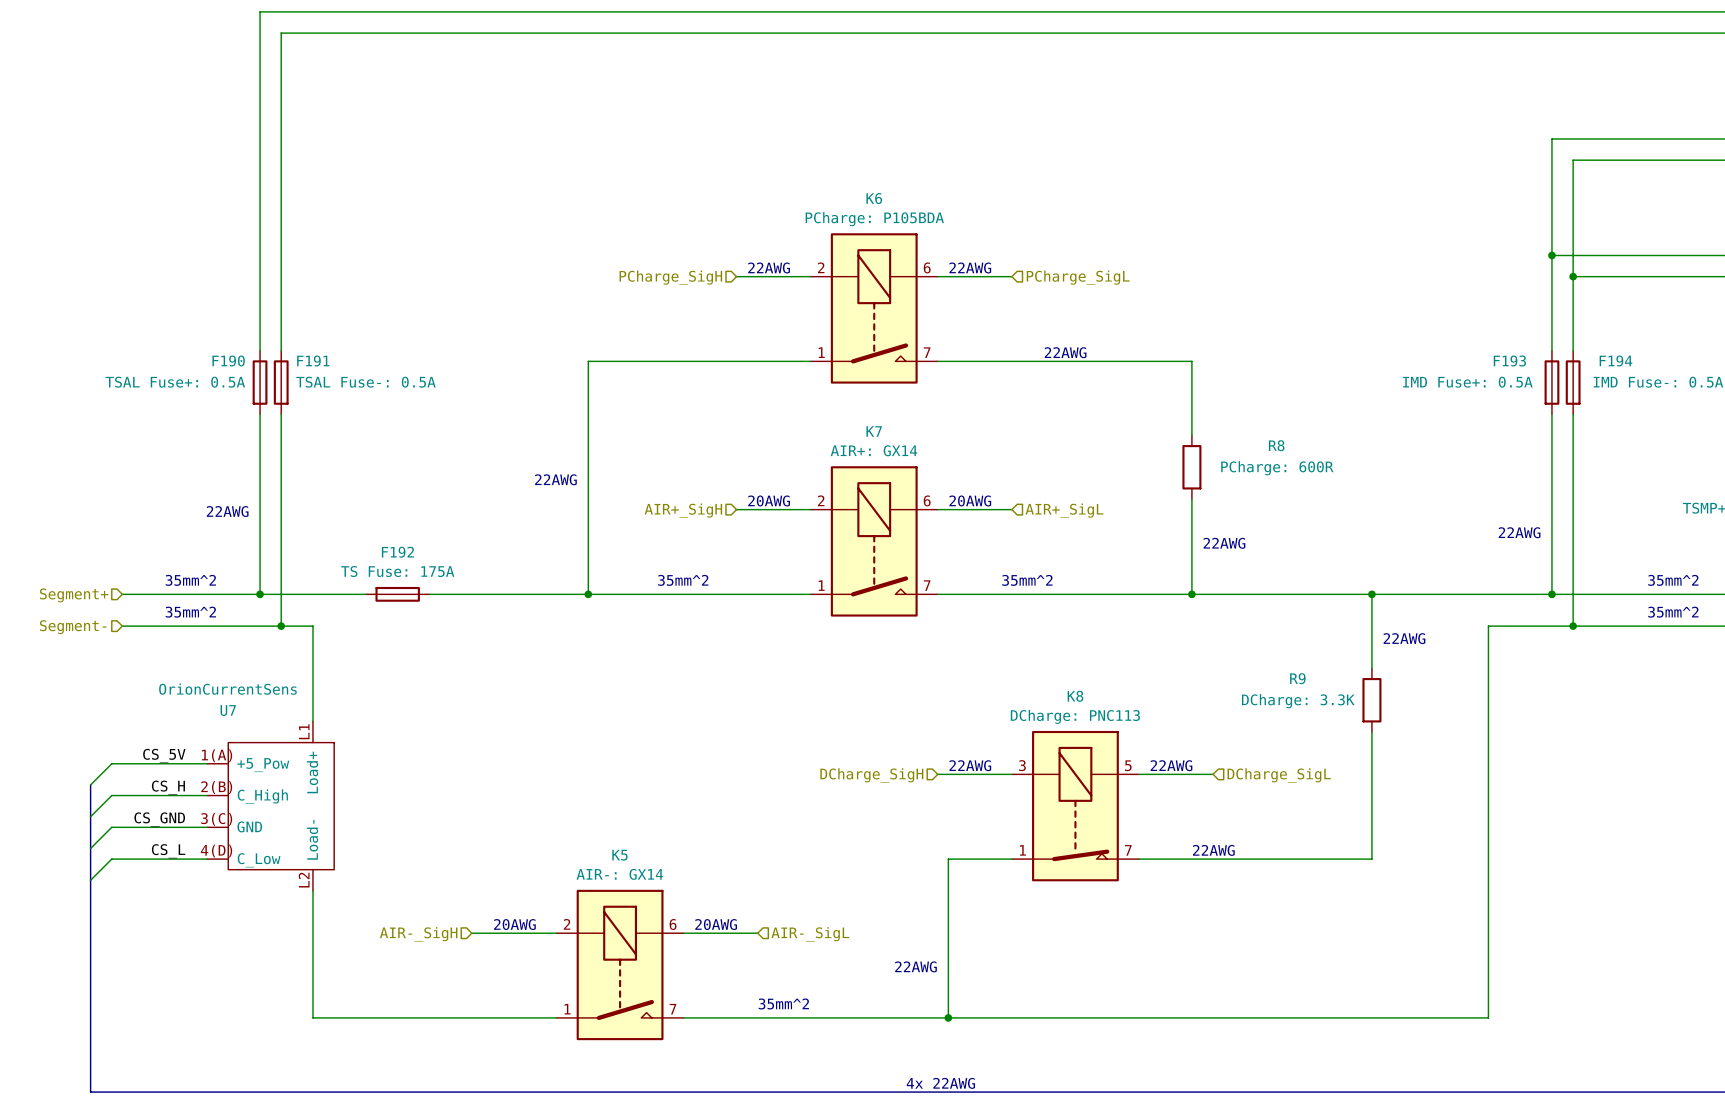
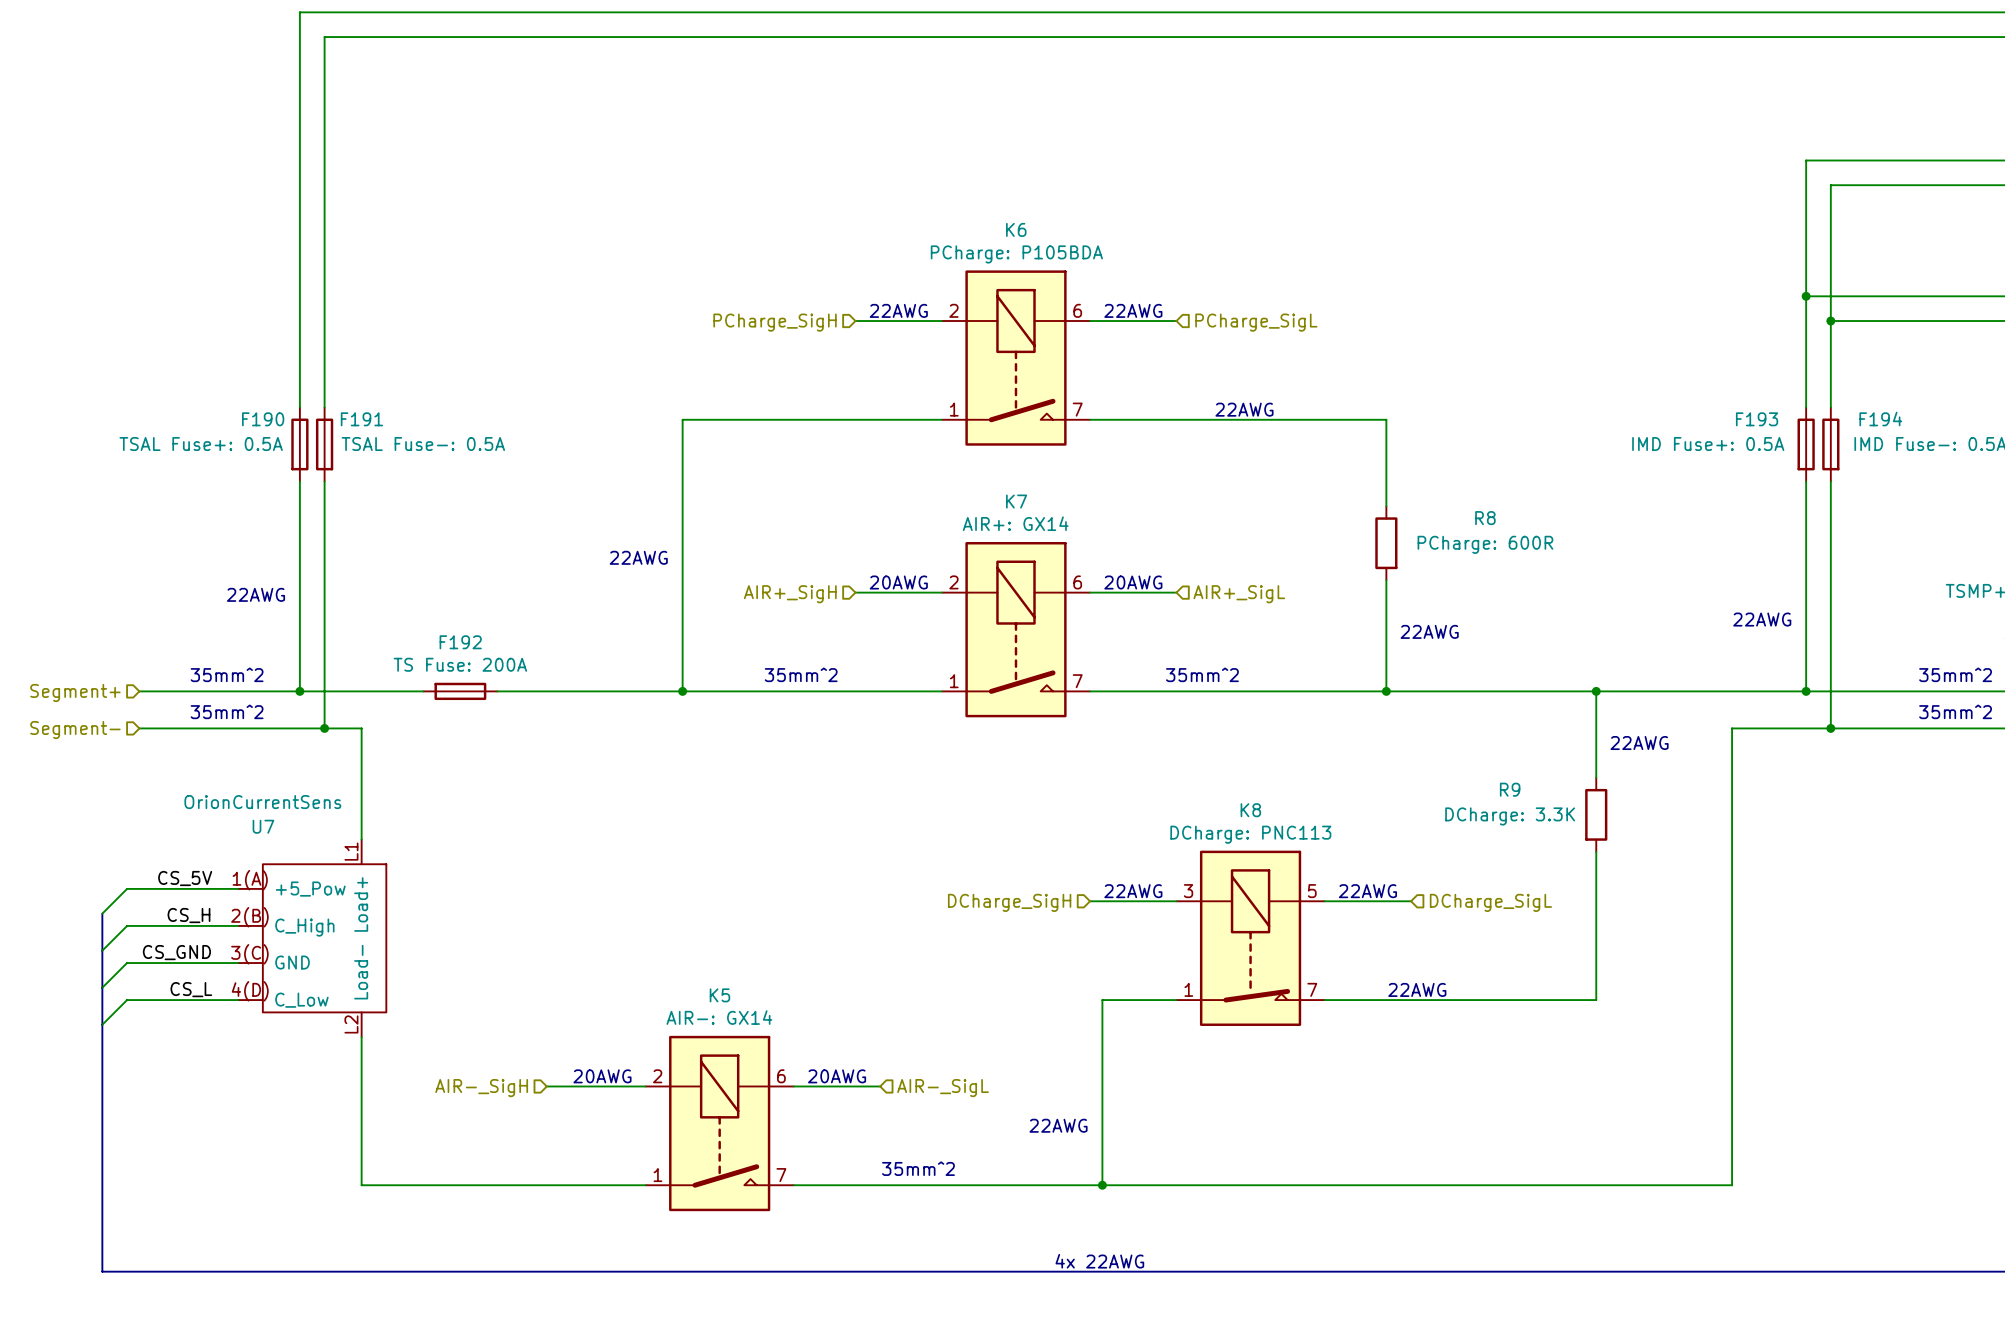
F192 value: TS Fuse: 175A (397, 571) -> TS Fuse: 200A (460, 664)

